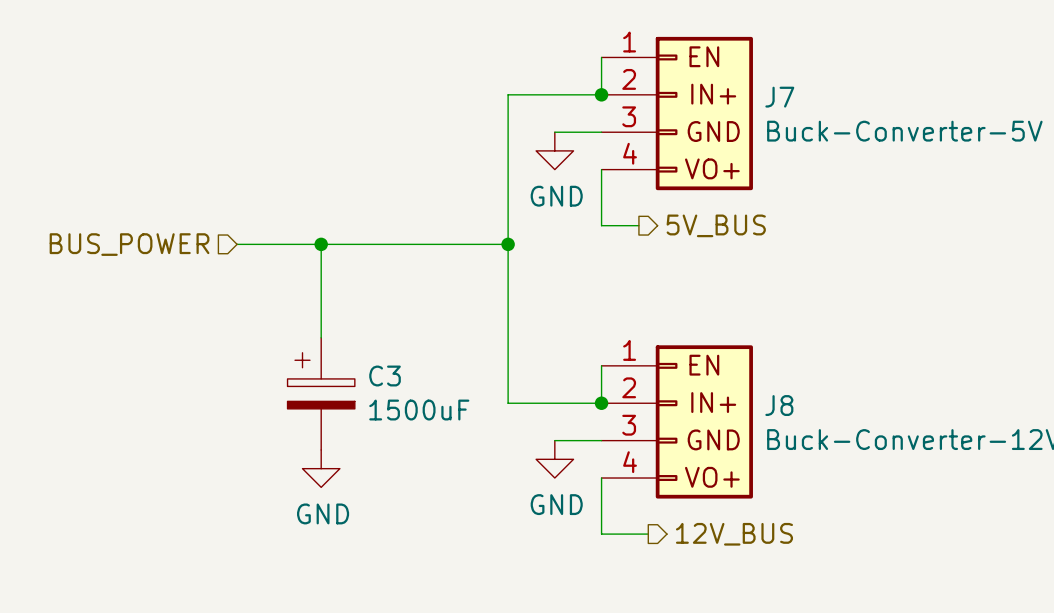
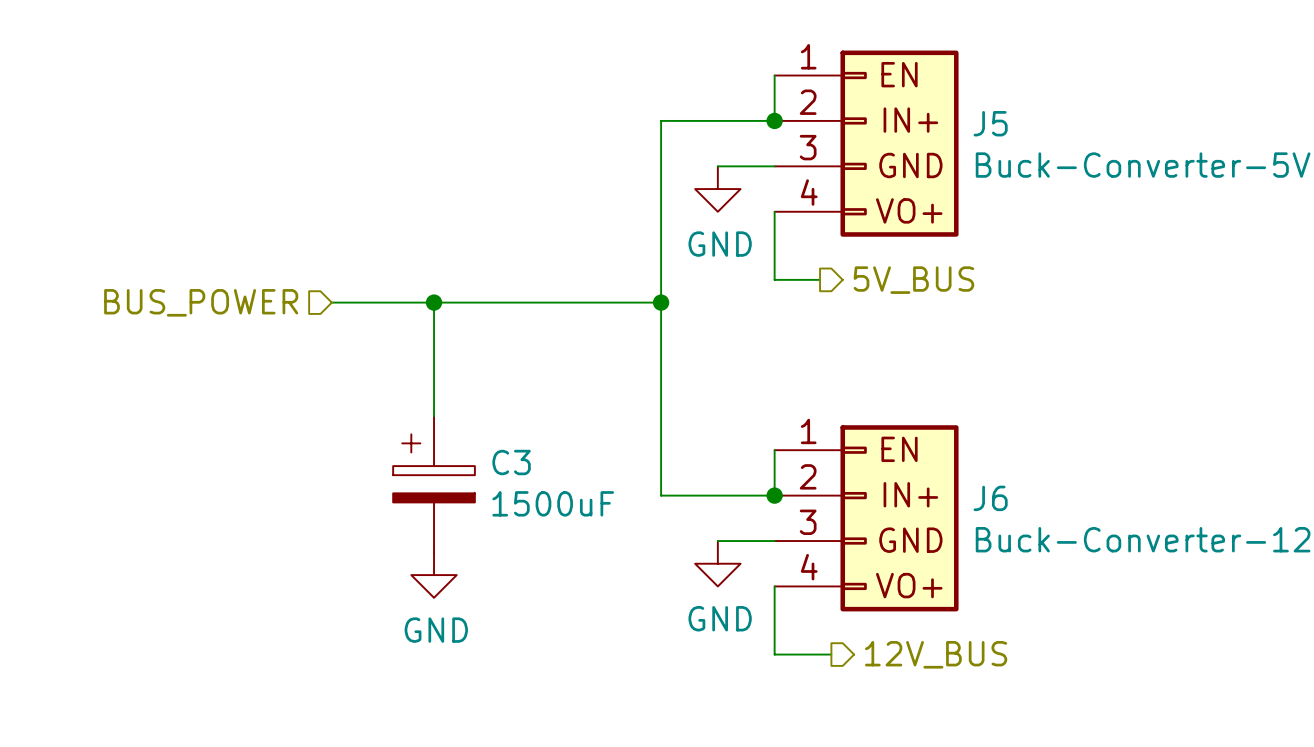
J7 name: J7 (779, 97) -> J5 (990, 123)
J8 name: J8 (779, 405) -> J6 (990, 498)

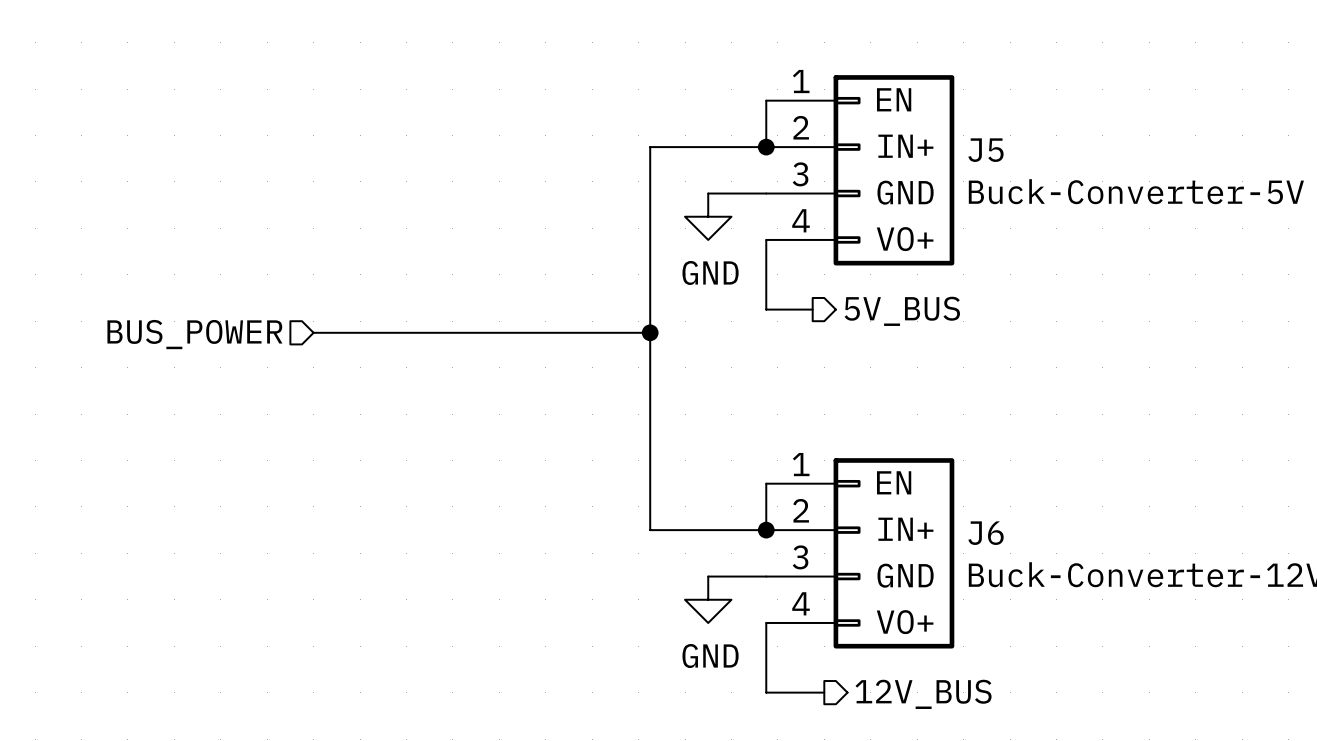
wire: (434, 302) (434, 416) -> none
junction: (434, 302) -> none
C3: 1500uF (434, 484) -> none
power symbol: GND (434, 575) -> none

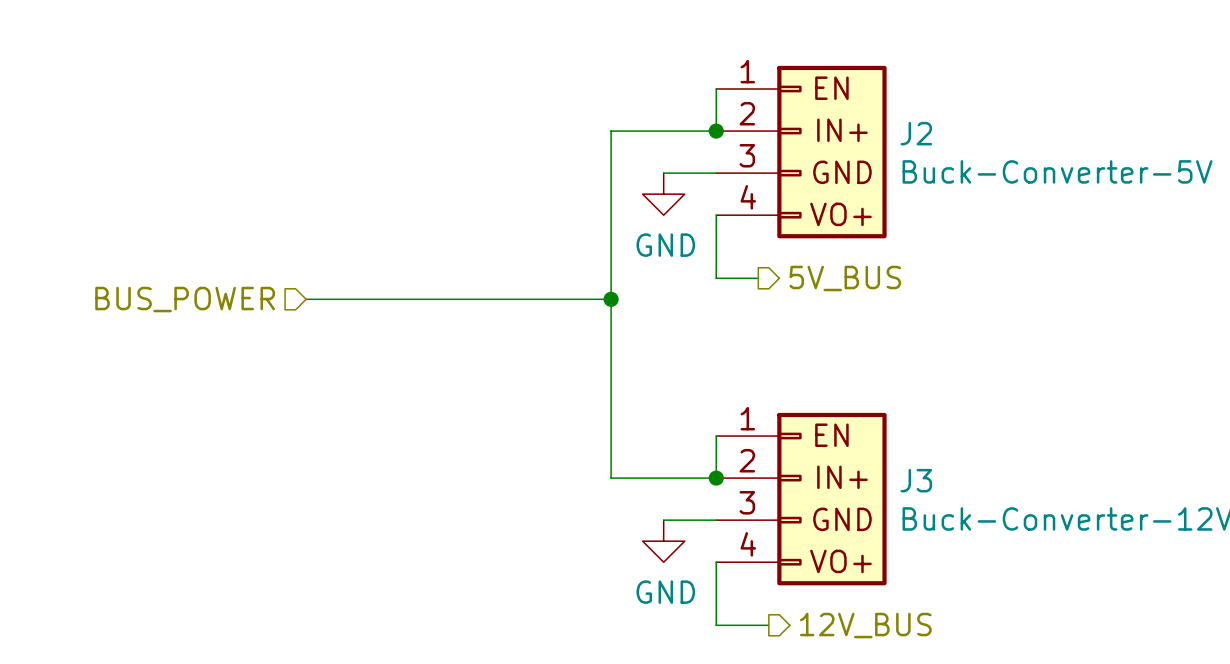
J5 name: J5 (985, 150) -> J2 (916, 133)
J6 name: J6 (986, 533) -> J3 (916, 480)

